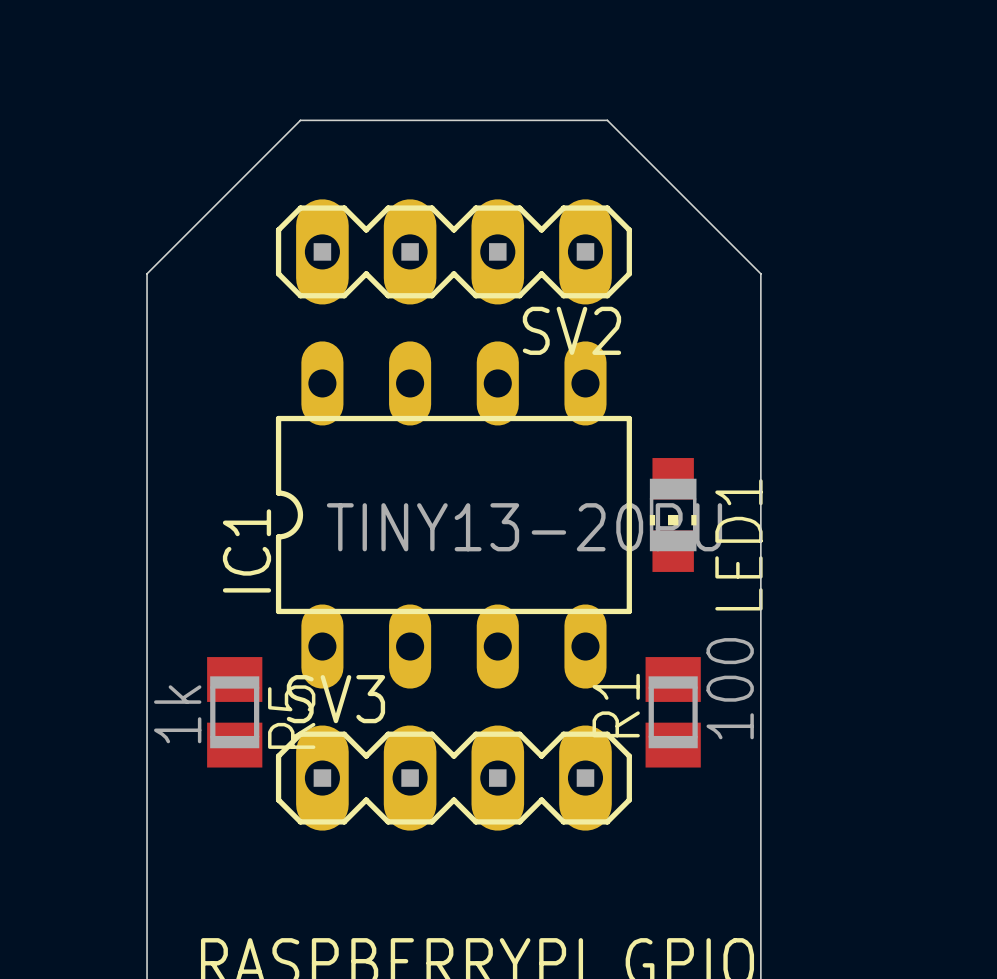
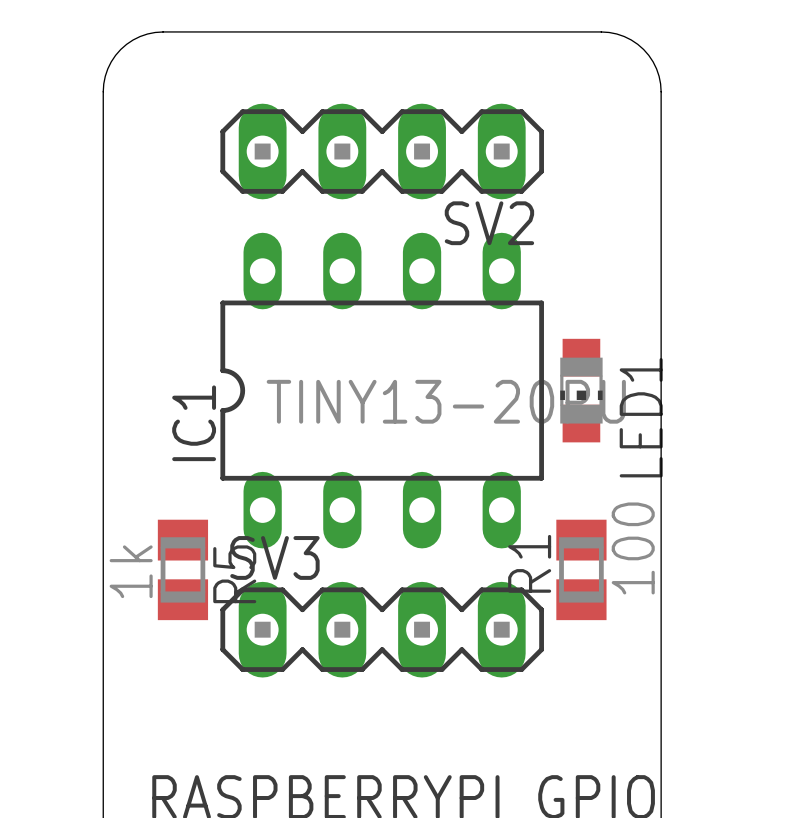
board edge: (300, 120) (147, 273) -> (242, 31) (155, 32) (133, 39) (120, 49) (111, 61) (103, 83) (103, 171)
board edge: (607, 120) (760, 273) -> (521, 31) (609, 32) (631, 39) (643, 49) (653, 61) (660, 83) (661, 171)

